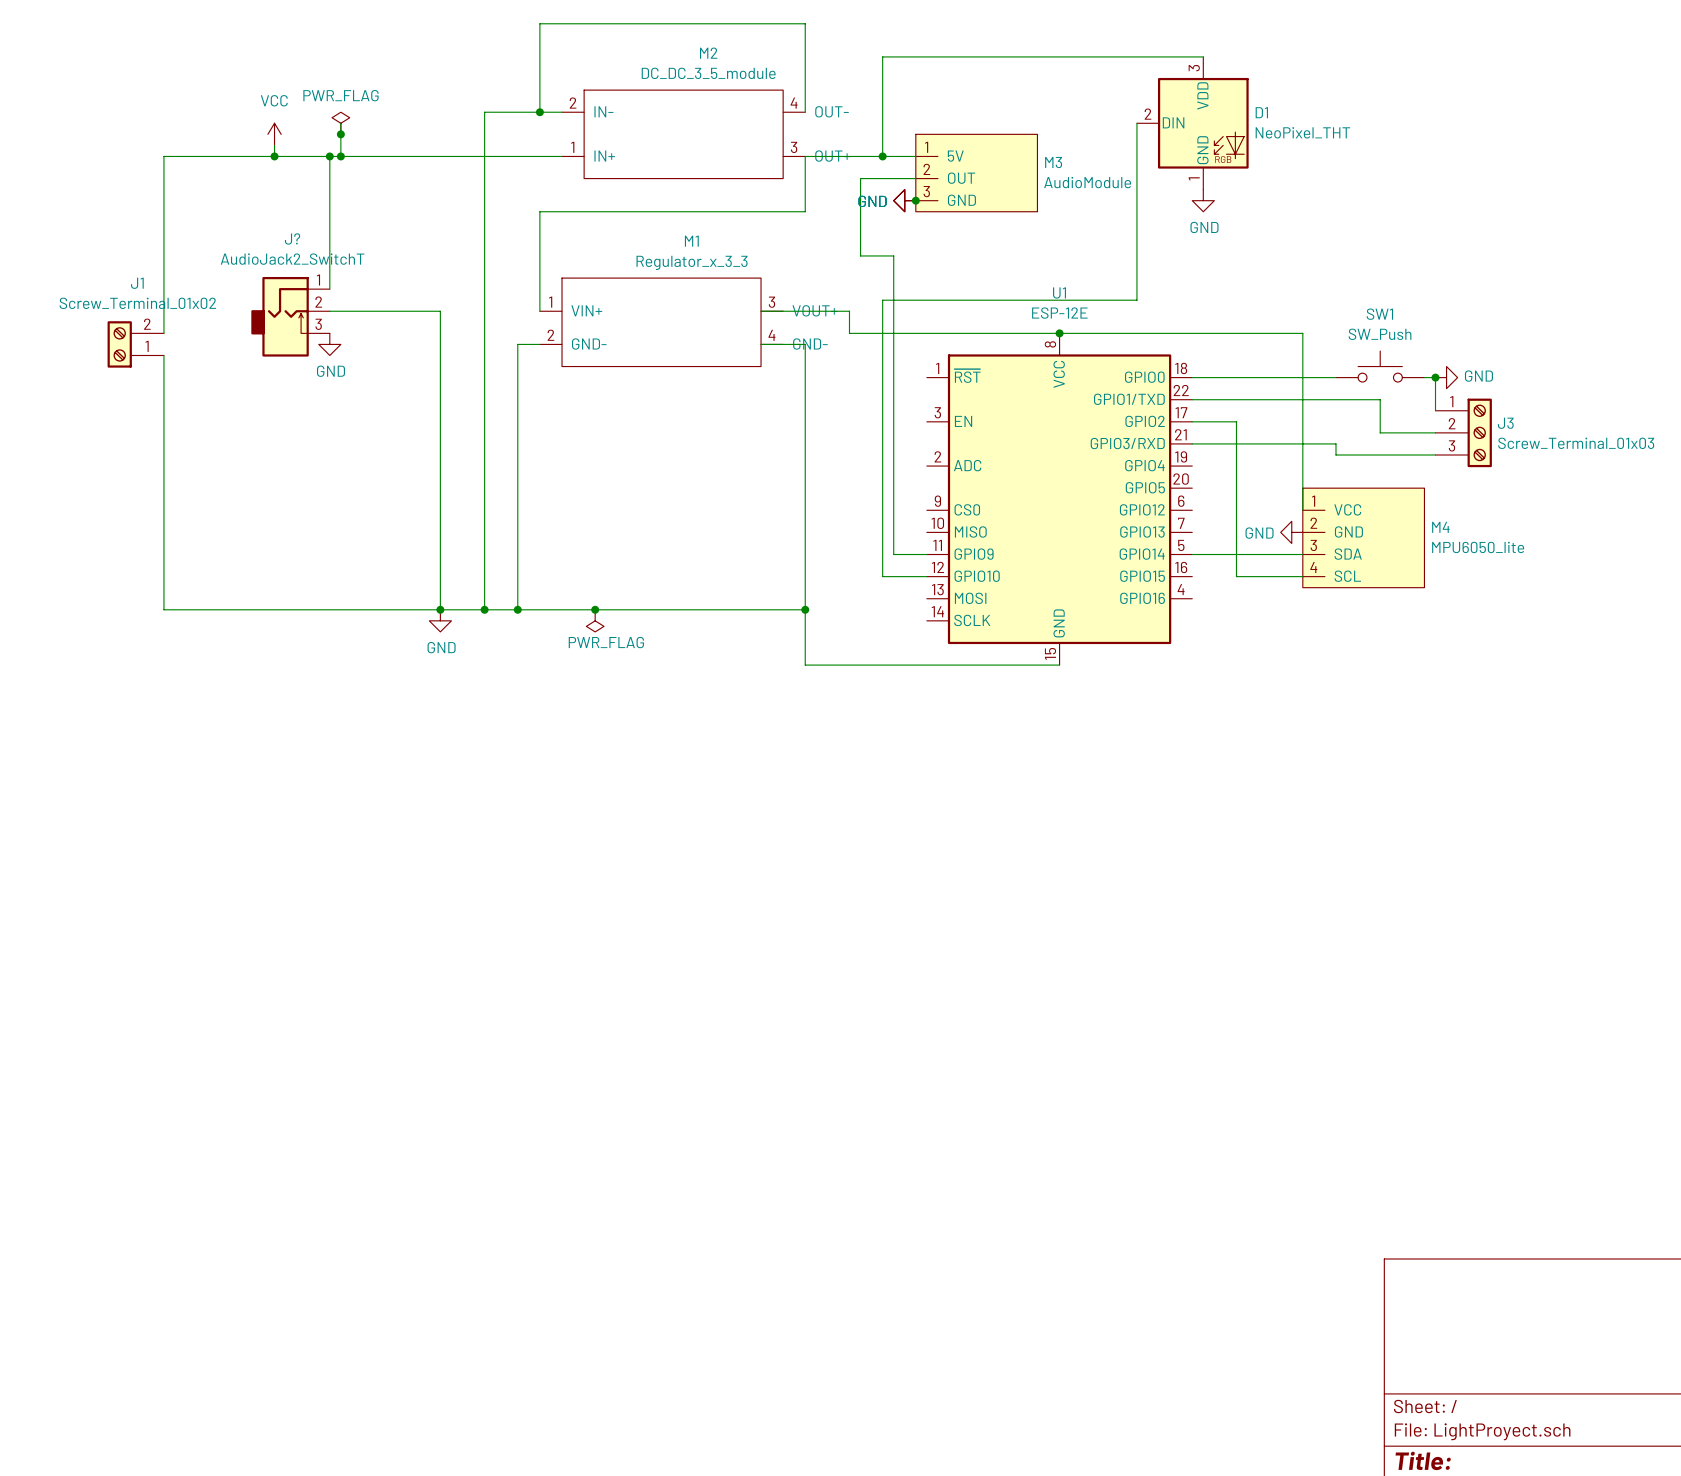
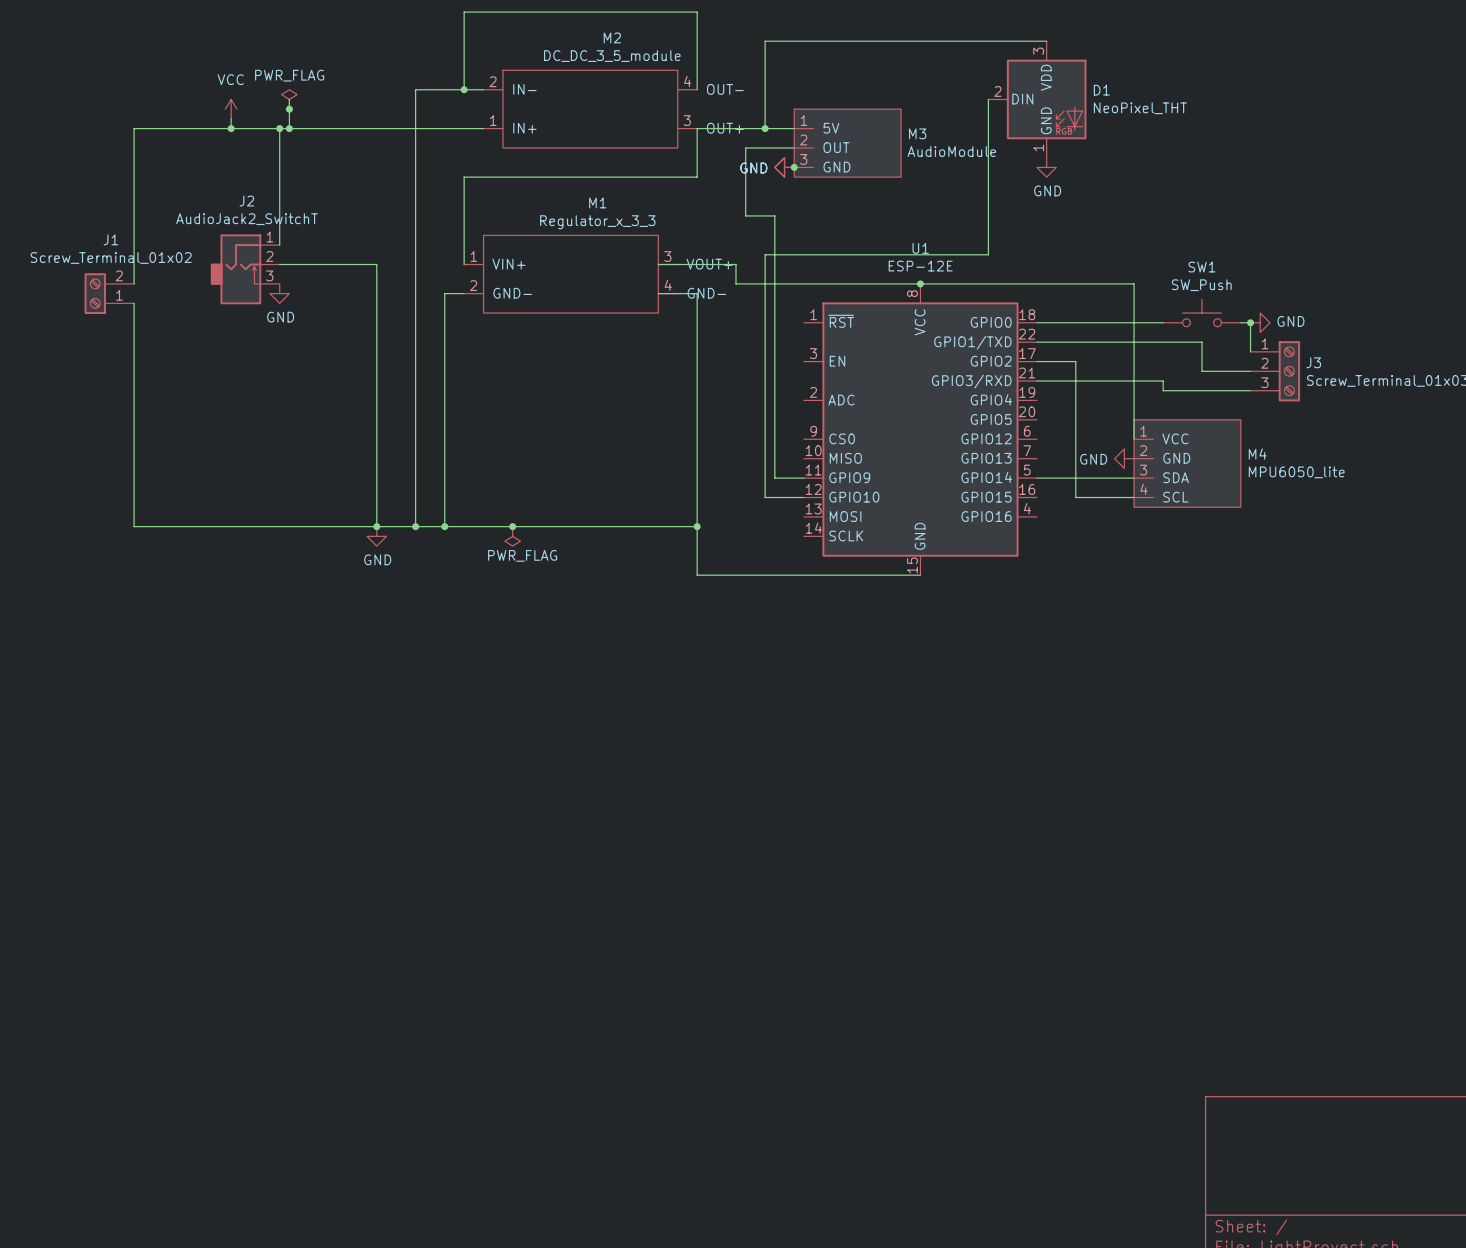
J? name: J? (292, 238) -> J2 (246, 201)

